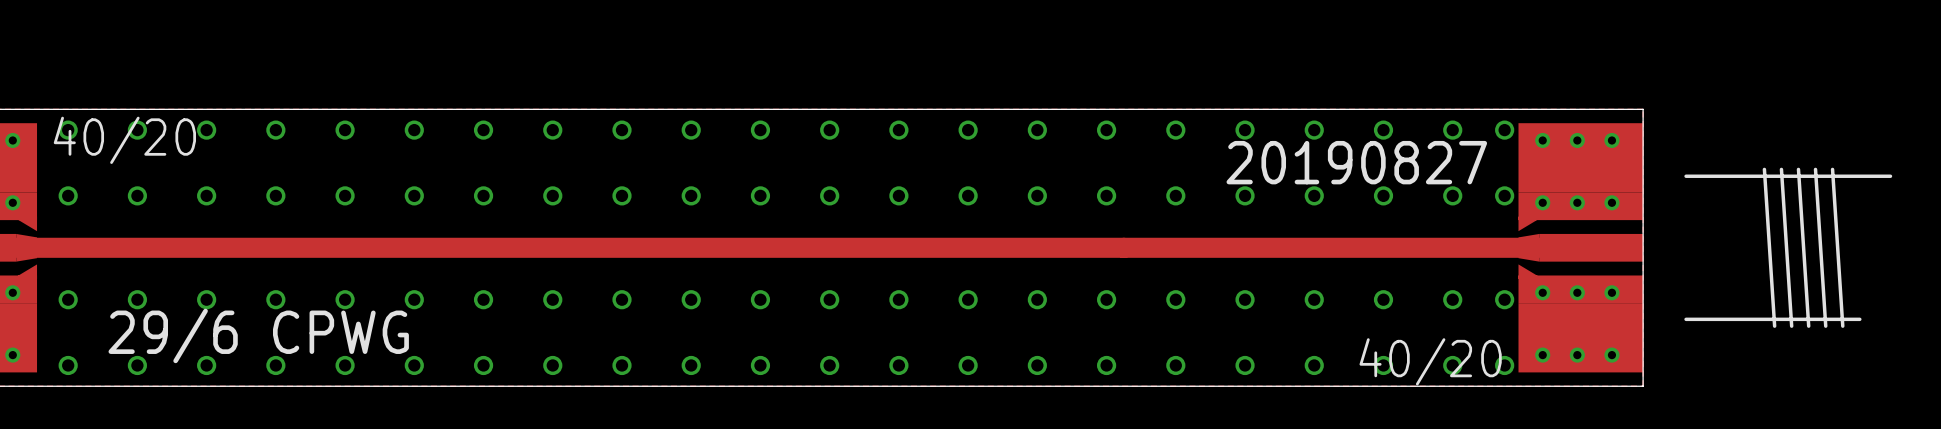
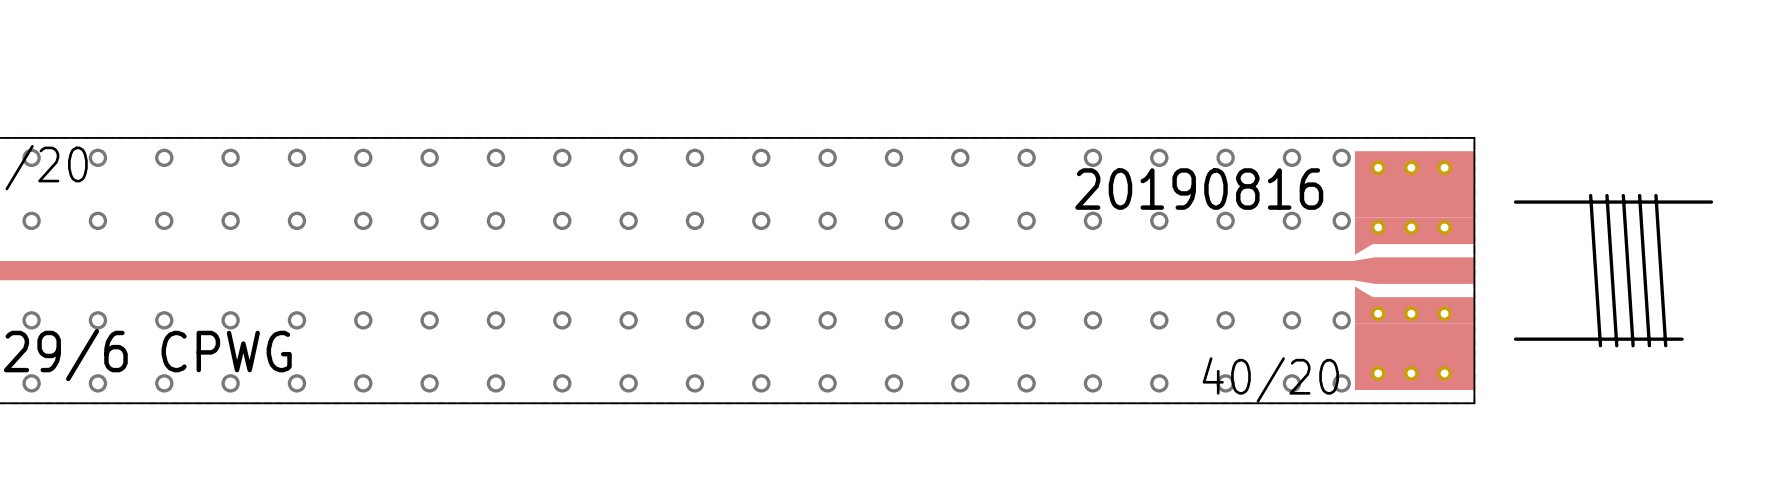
text: 20190827 (1356, 162) -> 20190816 (1199, 189)

